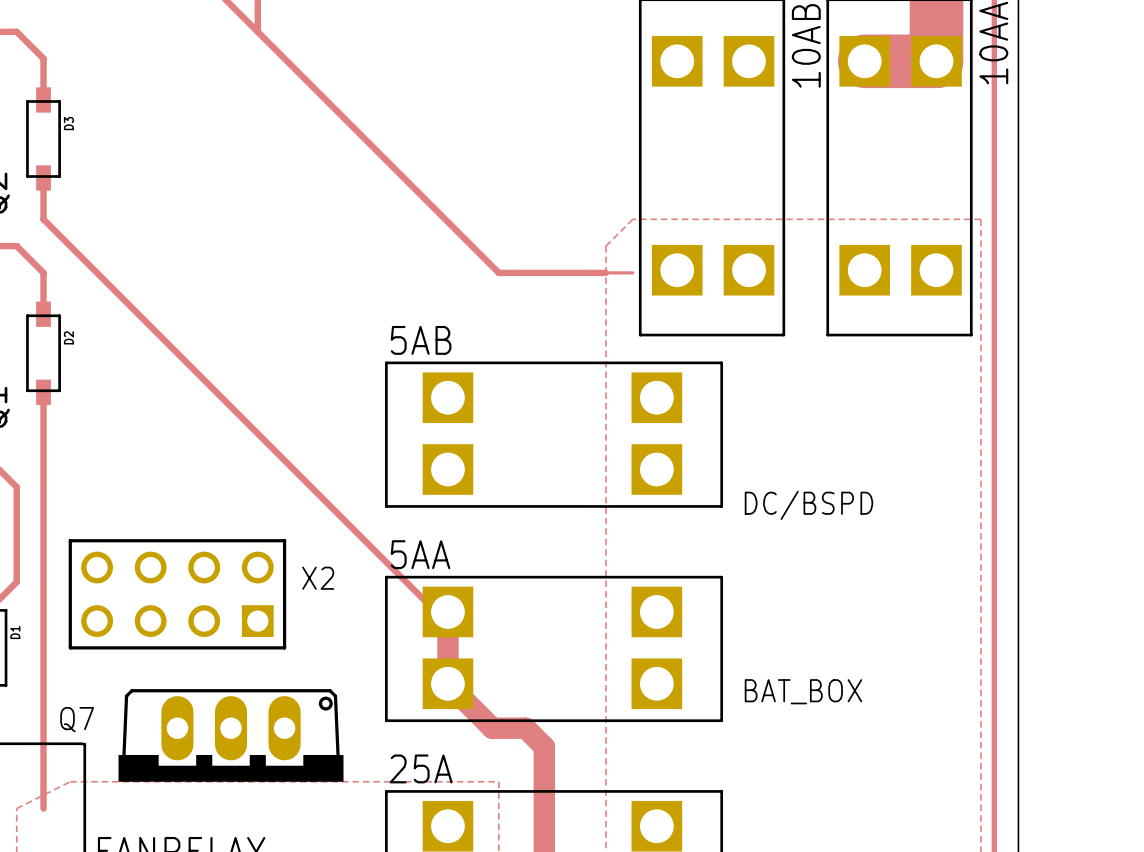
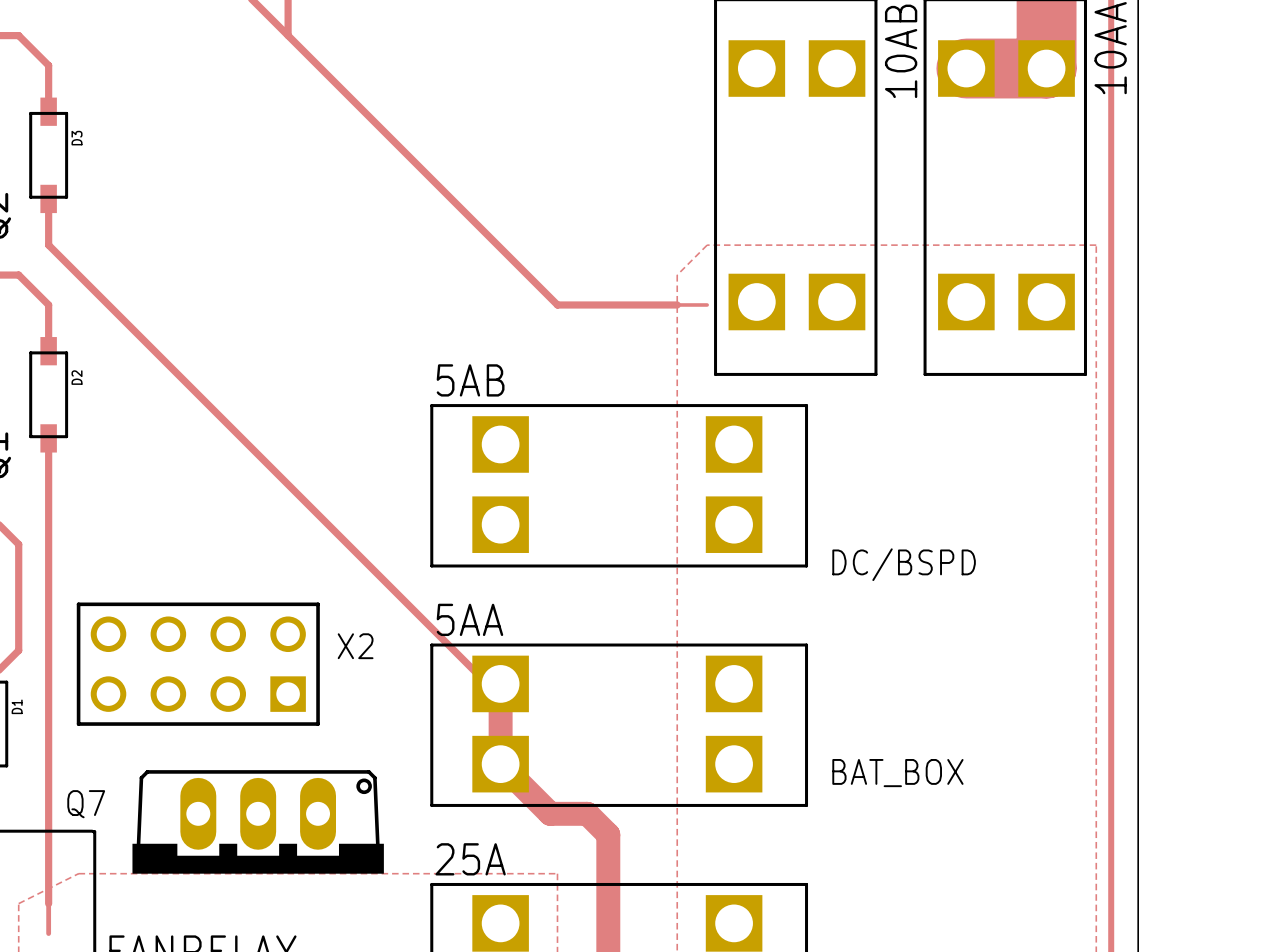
track: none -> (48, 903) (48, 933)

